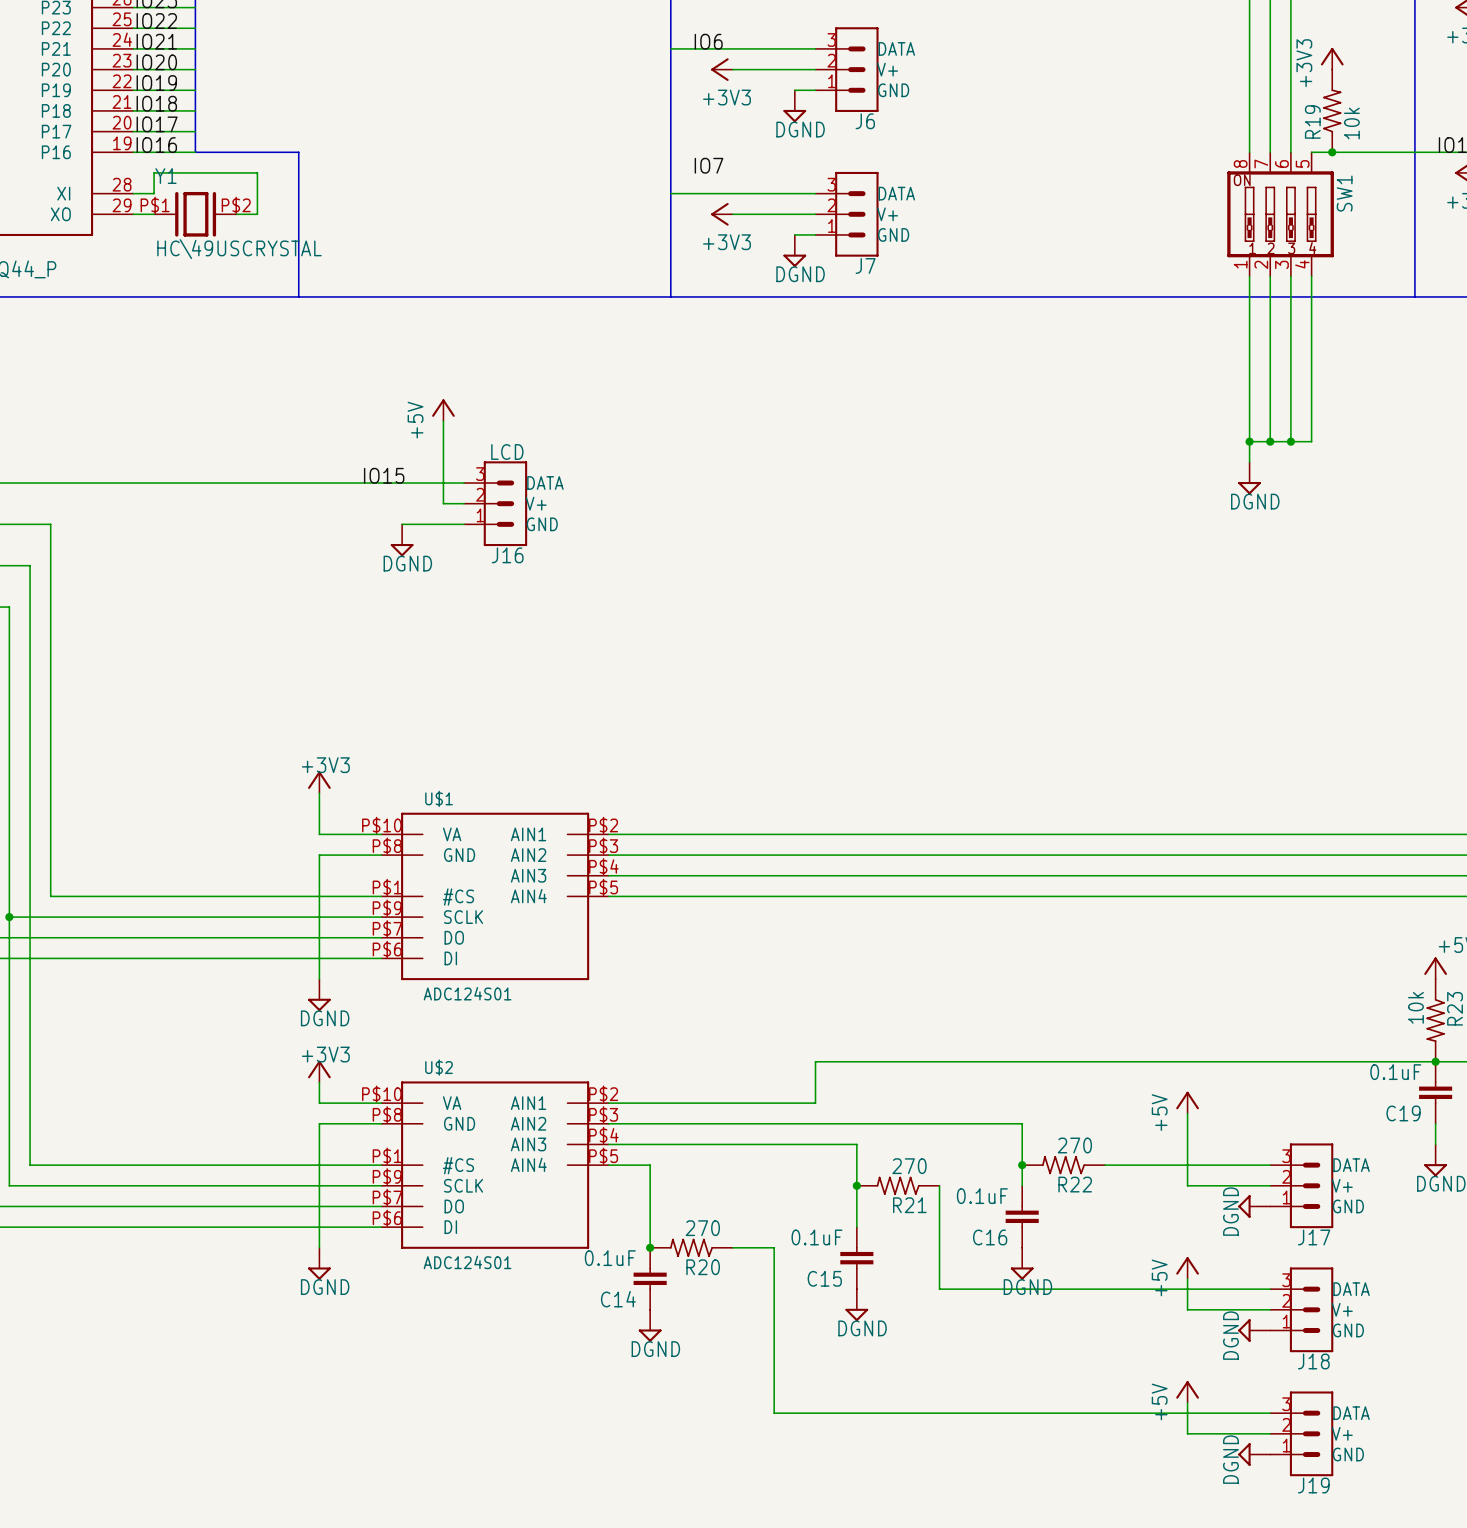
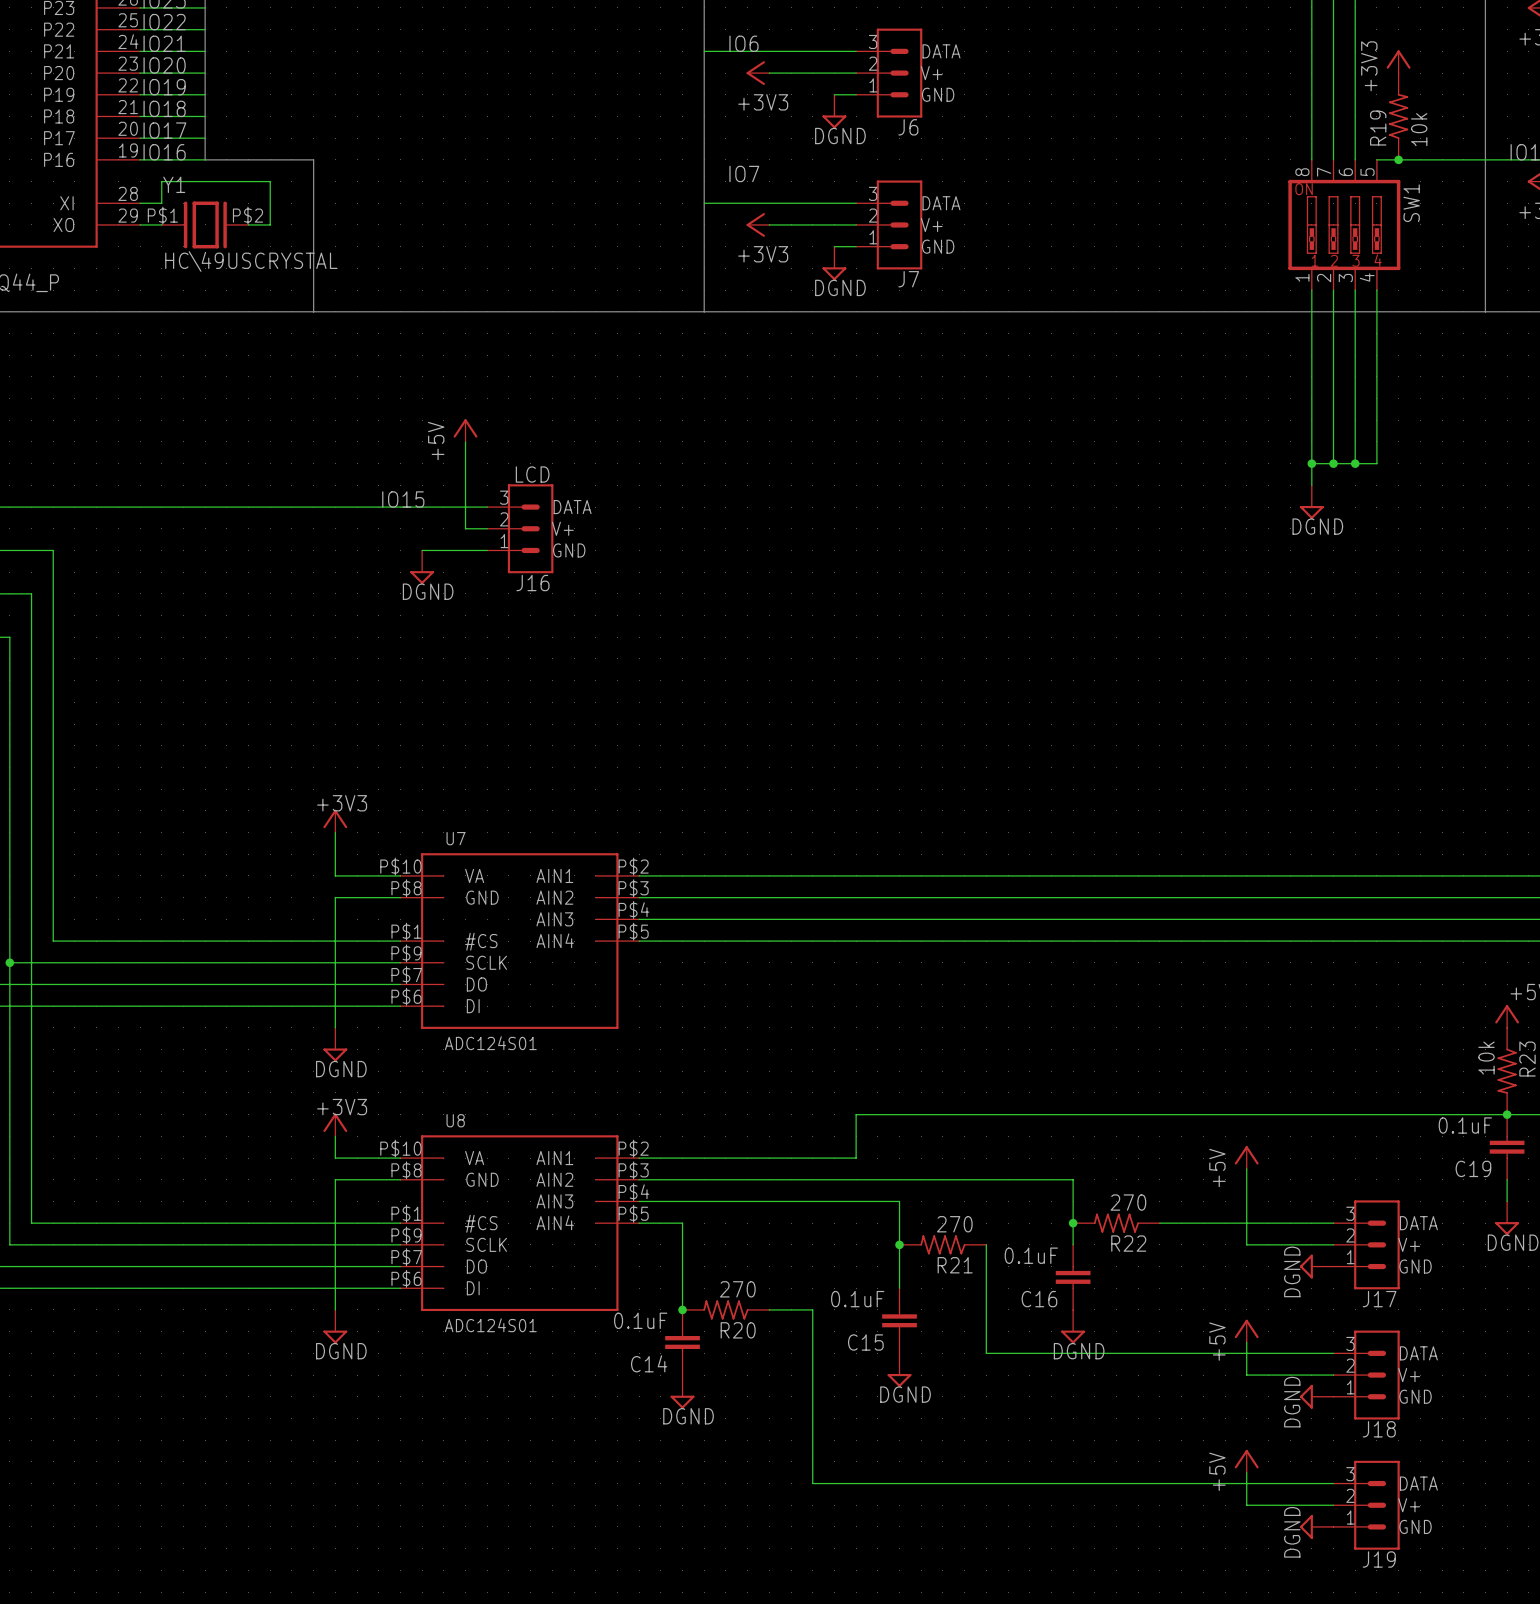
U$1 name: U$1 (439, 798) -> U7 (455, 838)
U$2 name: U$2 (439, 1067) -> U8 (455, 1120)

